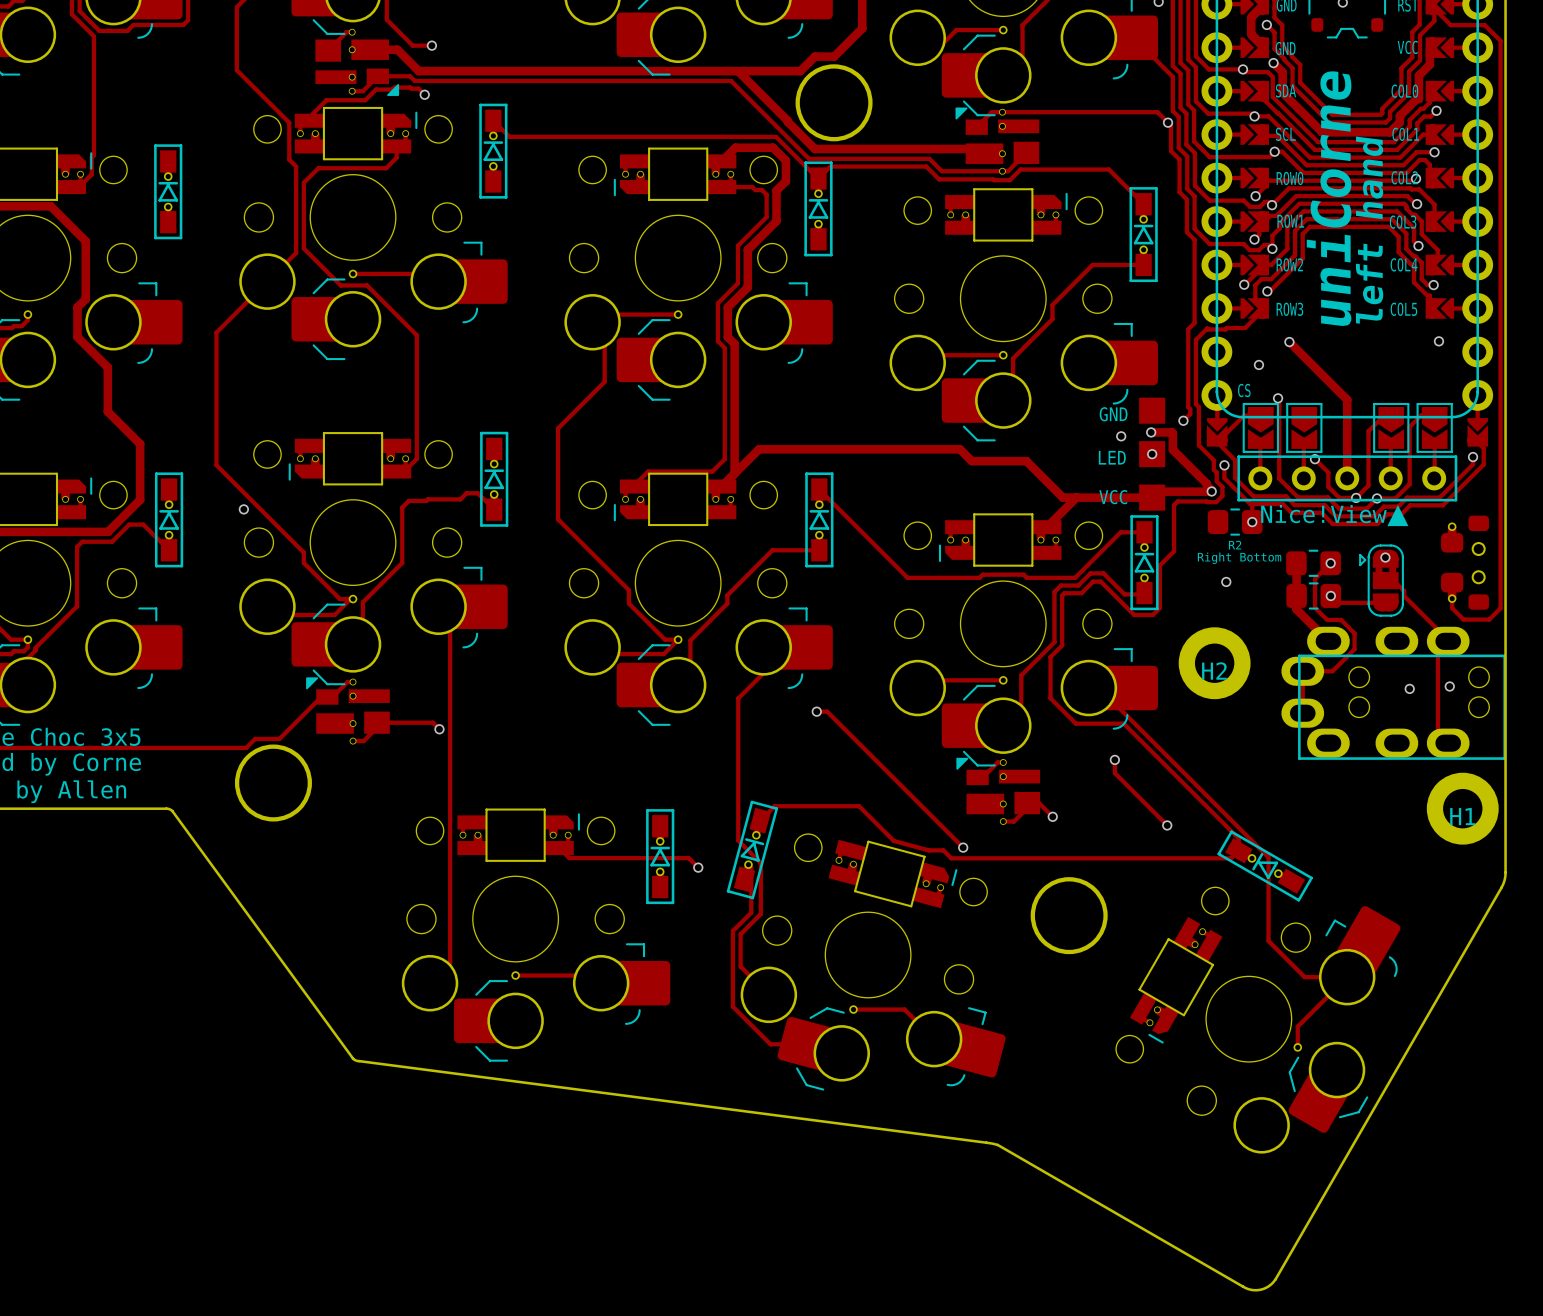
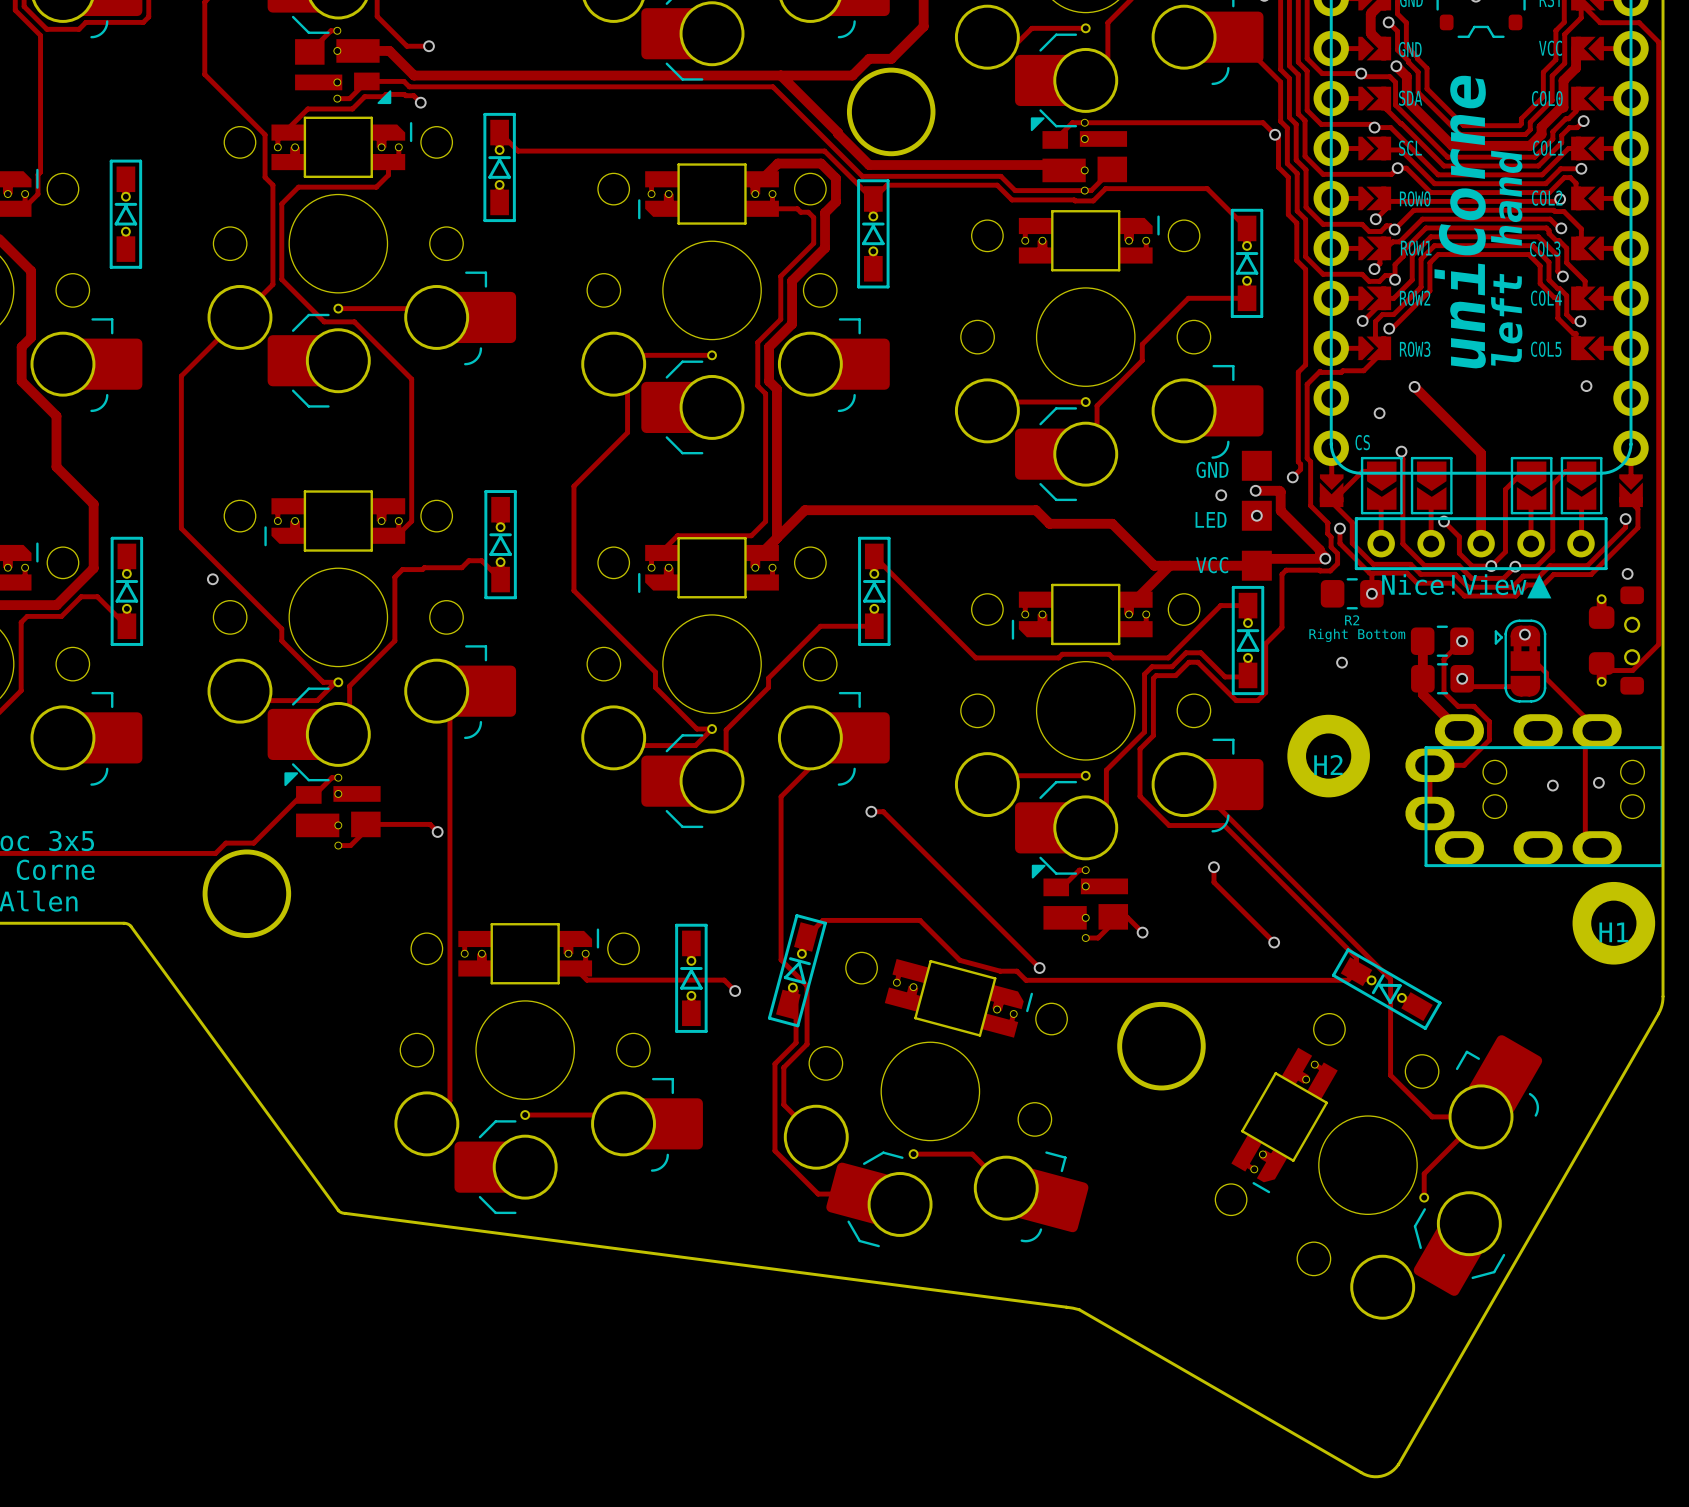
track: (1500, 40) (1500, 608) (1489, 619) (1463, 619) (1452, 608) (1452, 598) -> (1657, 40) (1658, 644) (1632, 670) (1608, 670) (1601, 663)
via: none -> (1627, 573)

